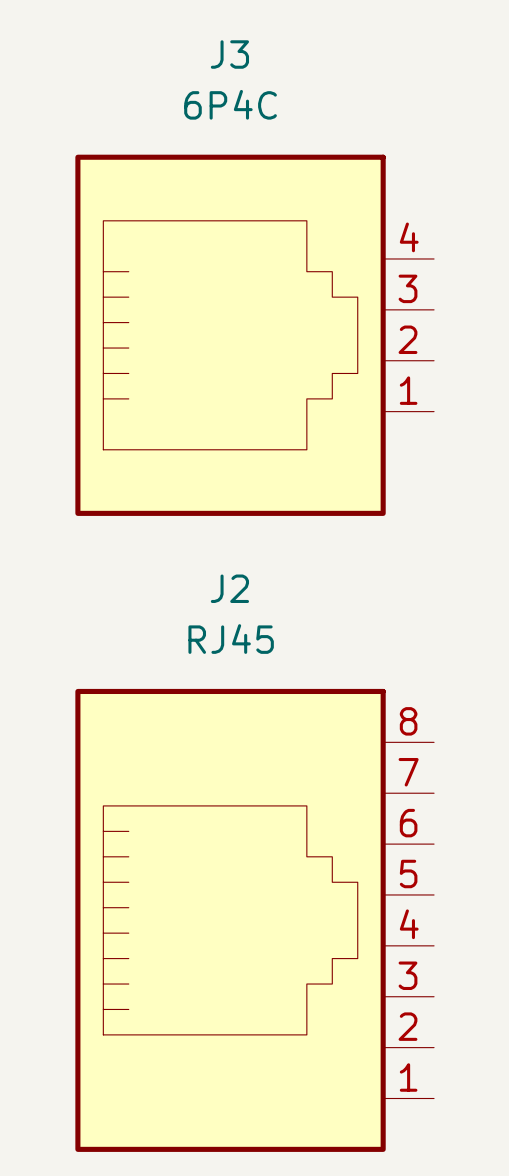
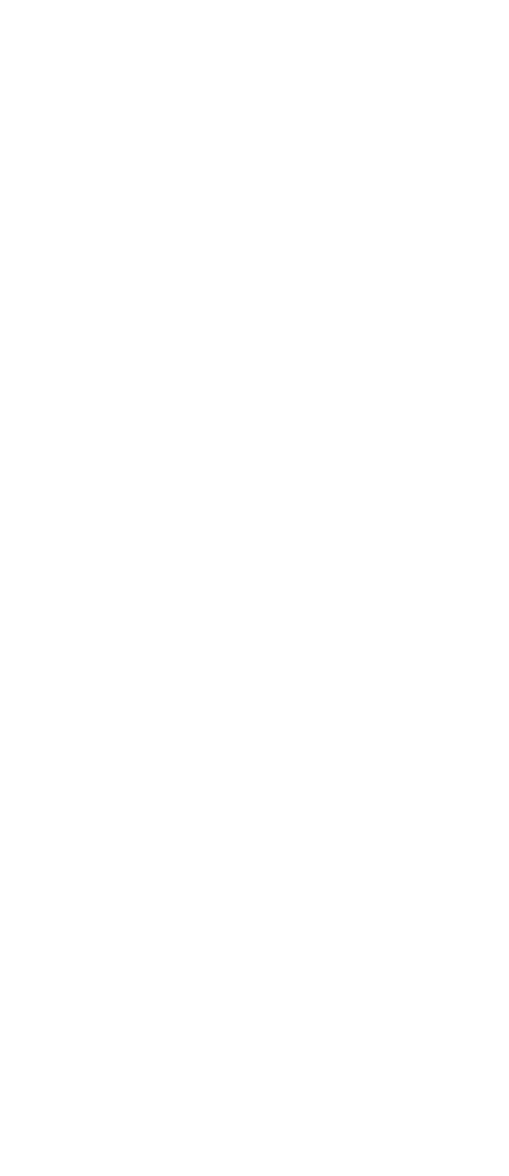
J3: 6P4C (254, 335) -> none
J2: RJ45 (254, 920) -> none

